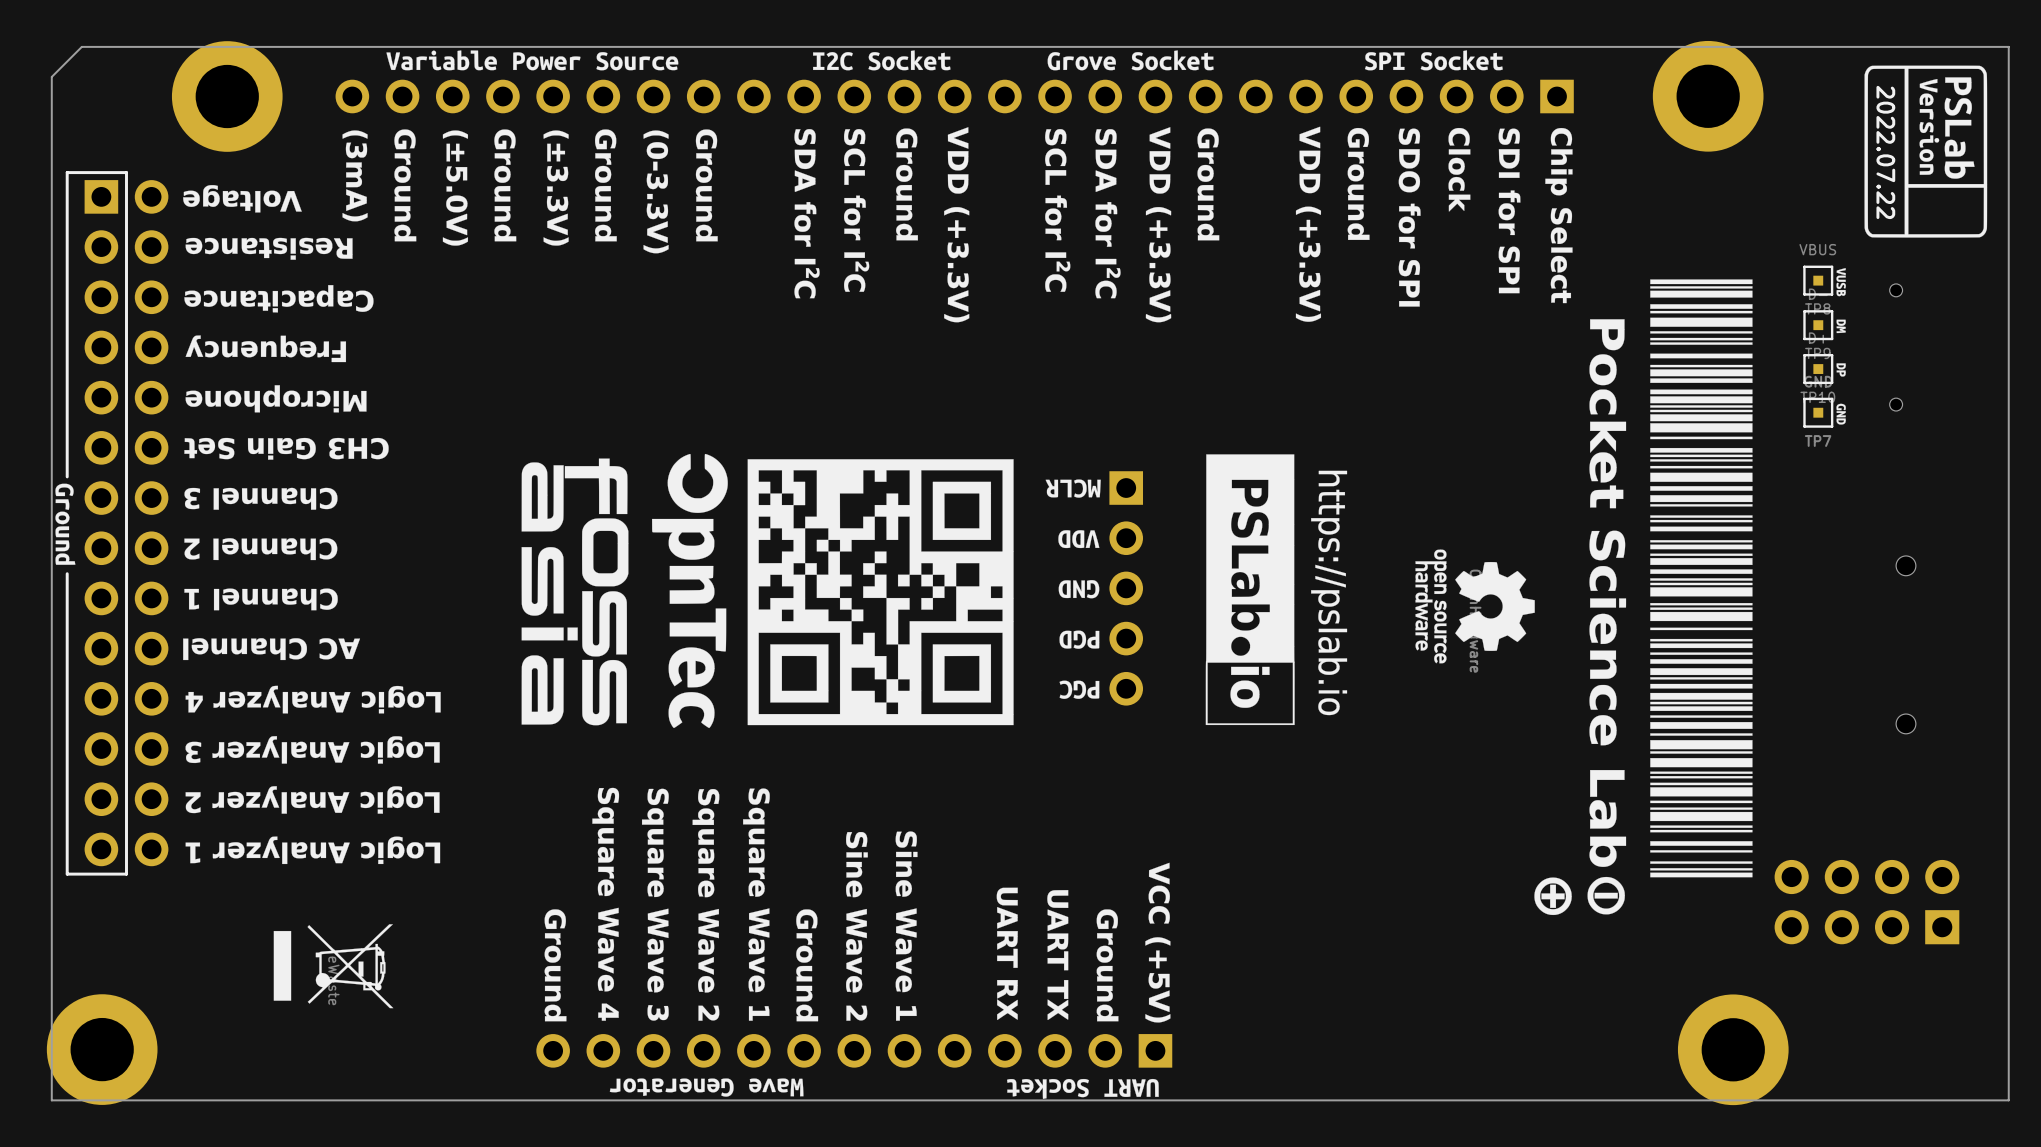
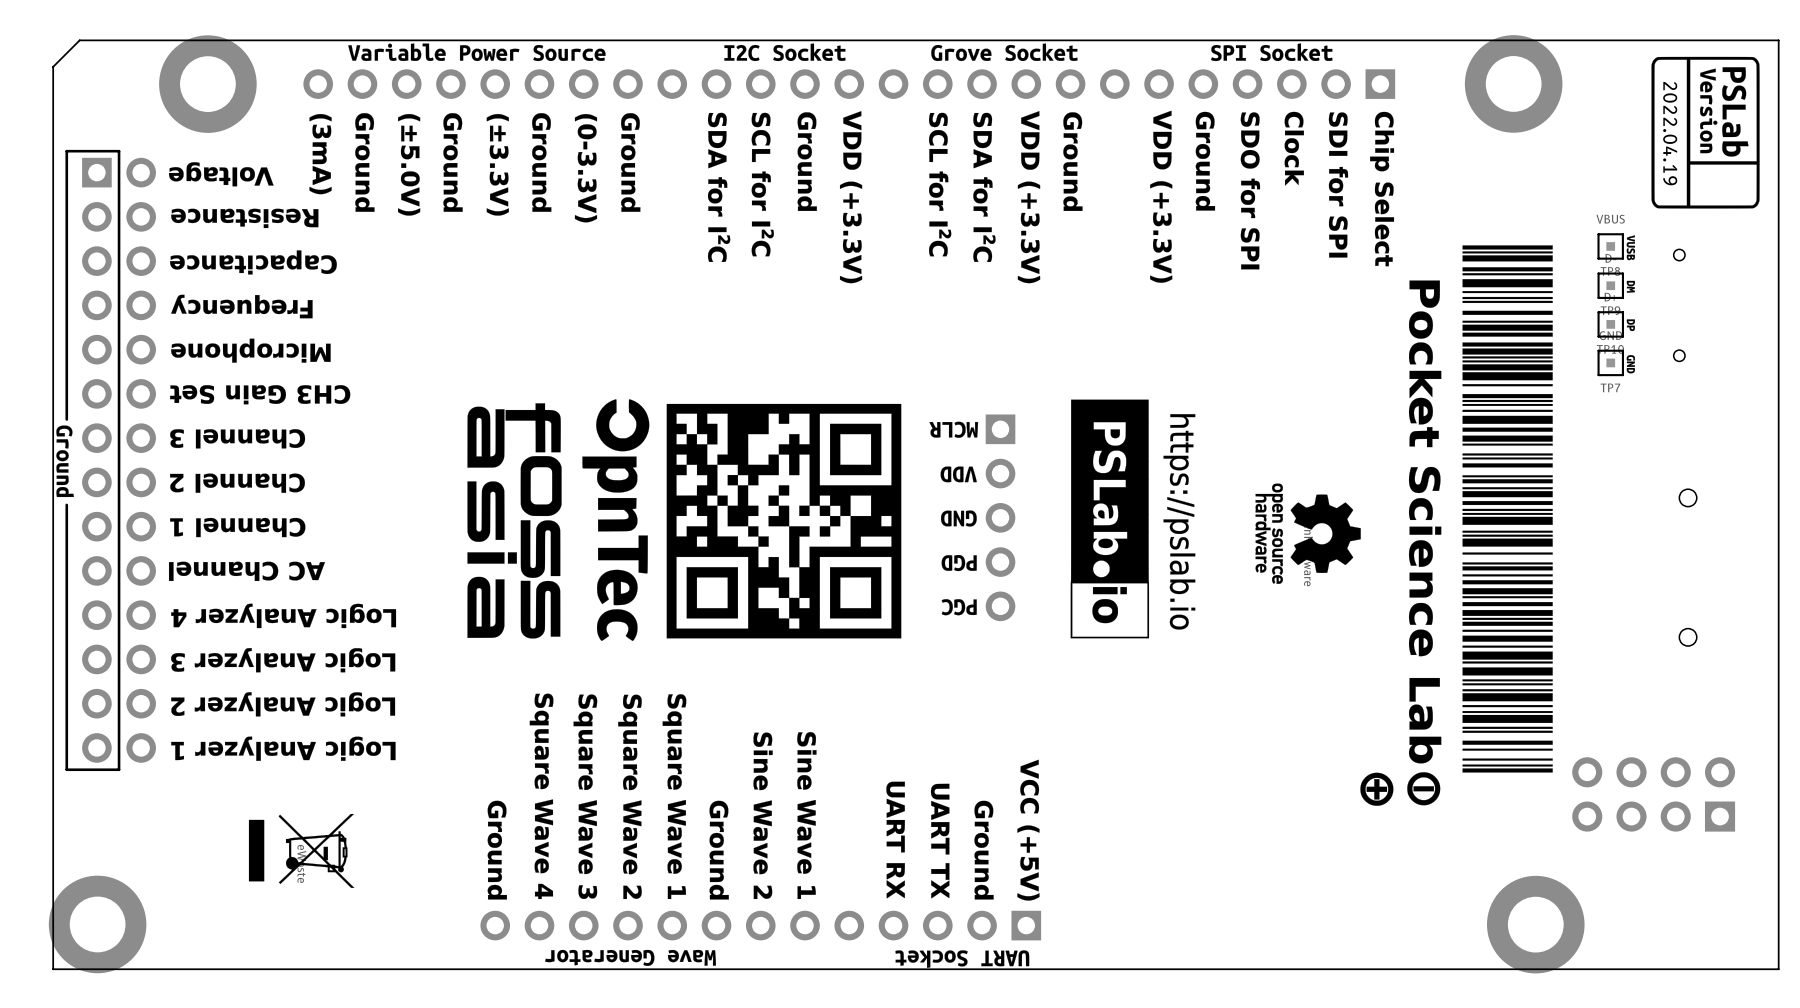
drawing shape: [55, 50, 1988, 1099] -> [56, 43, 1760, 969]

